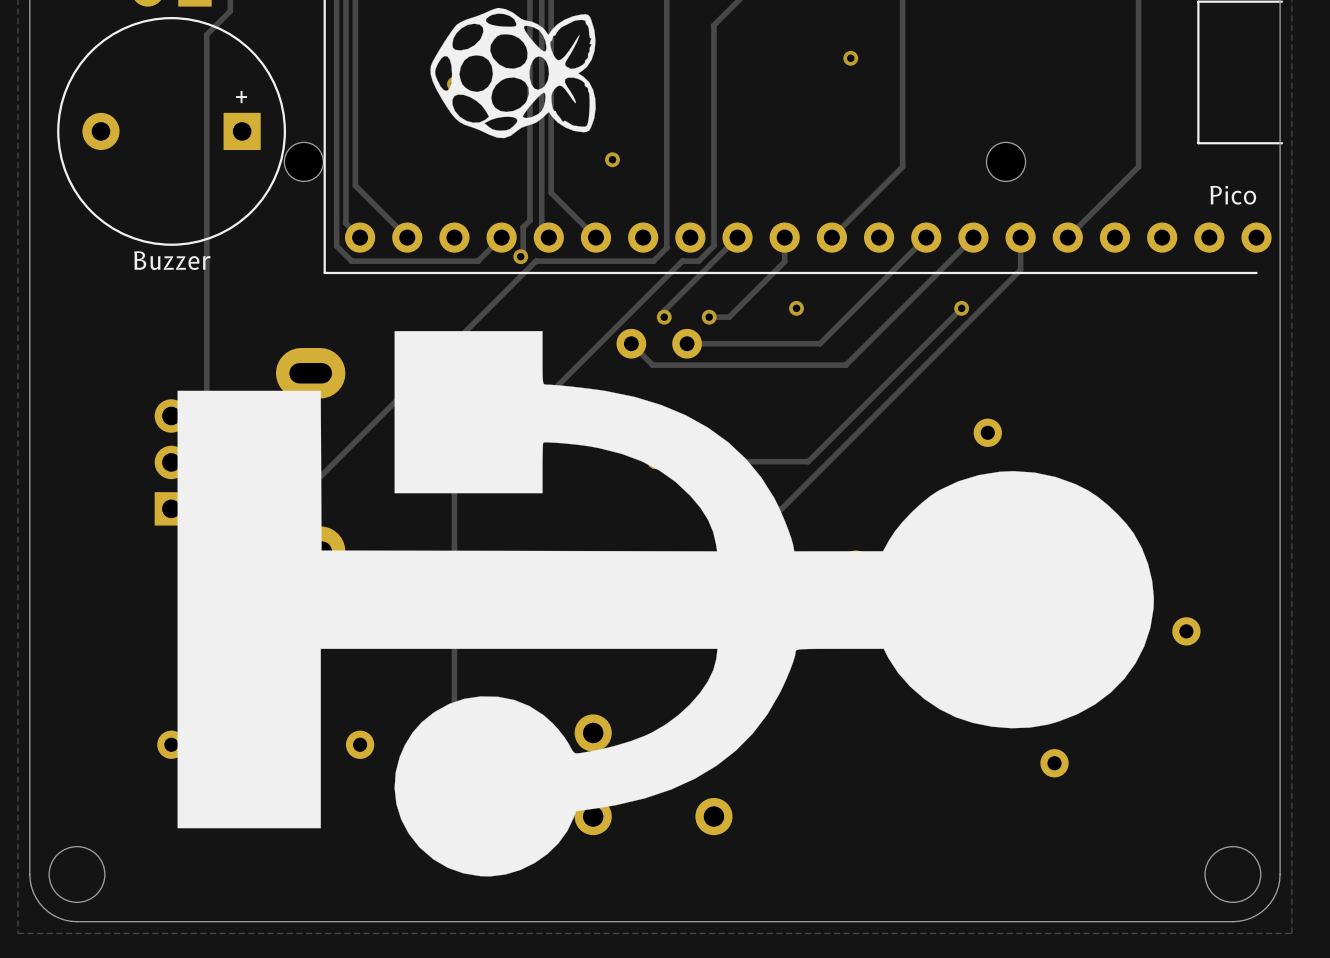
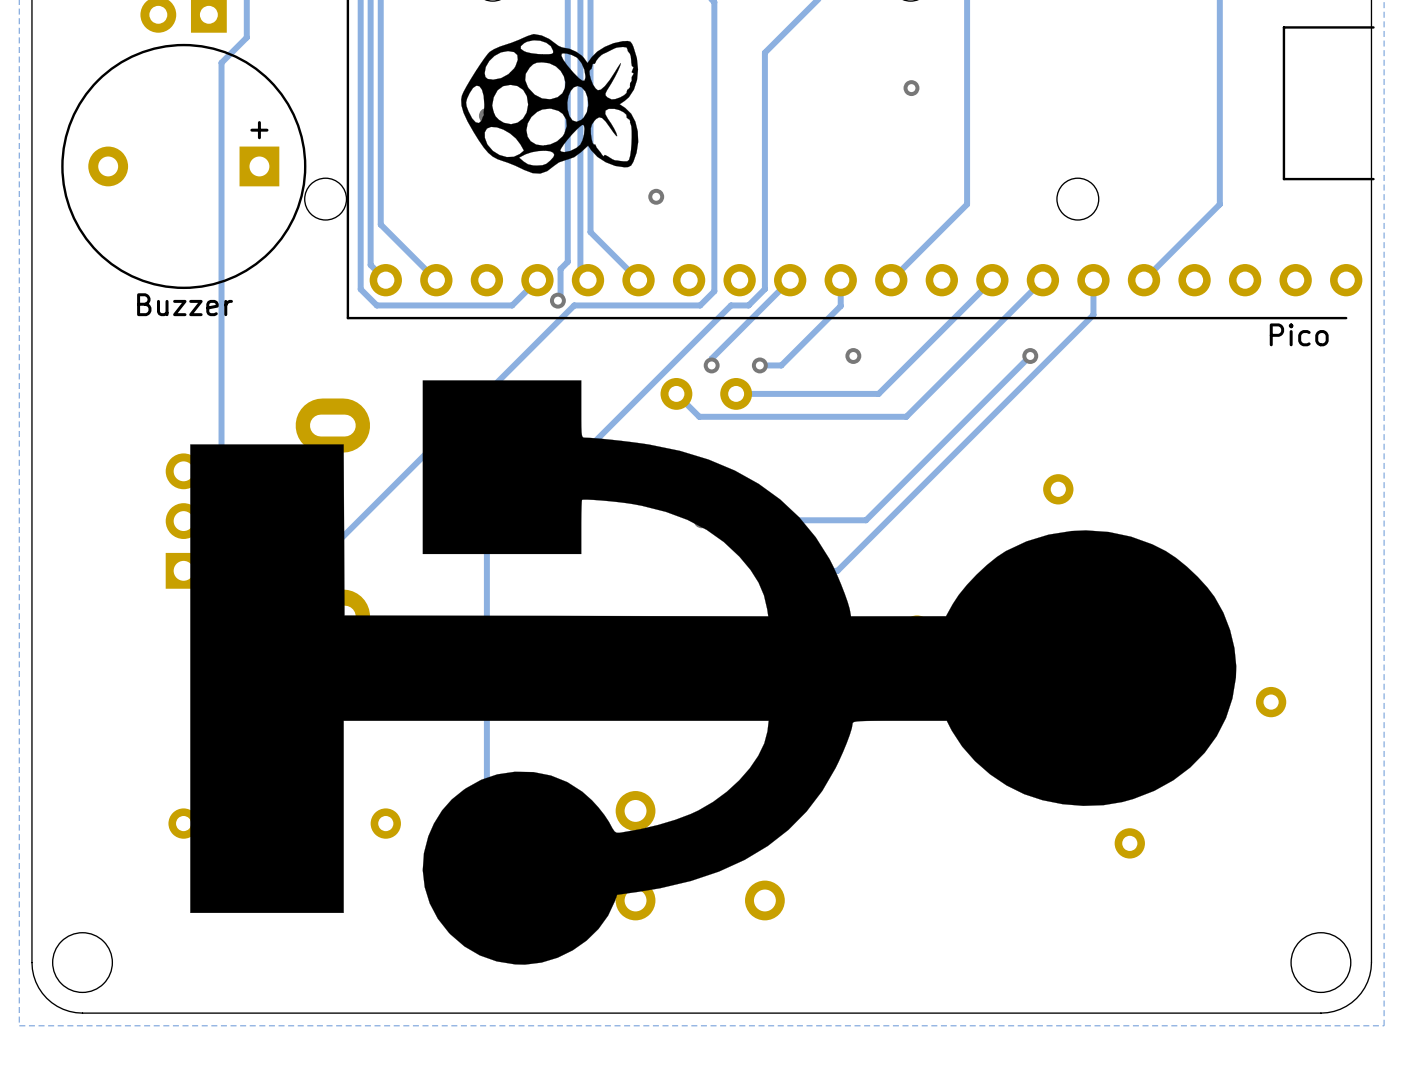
part value position: Pico (1233, 195) -> Pico (1299, 334)

